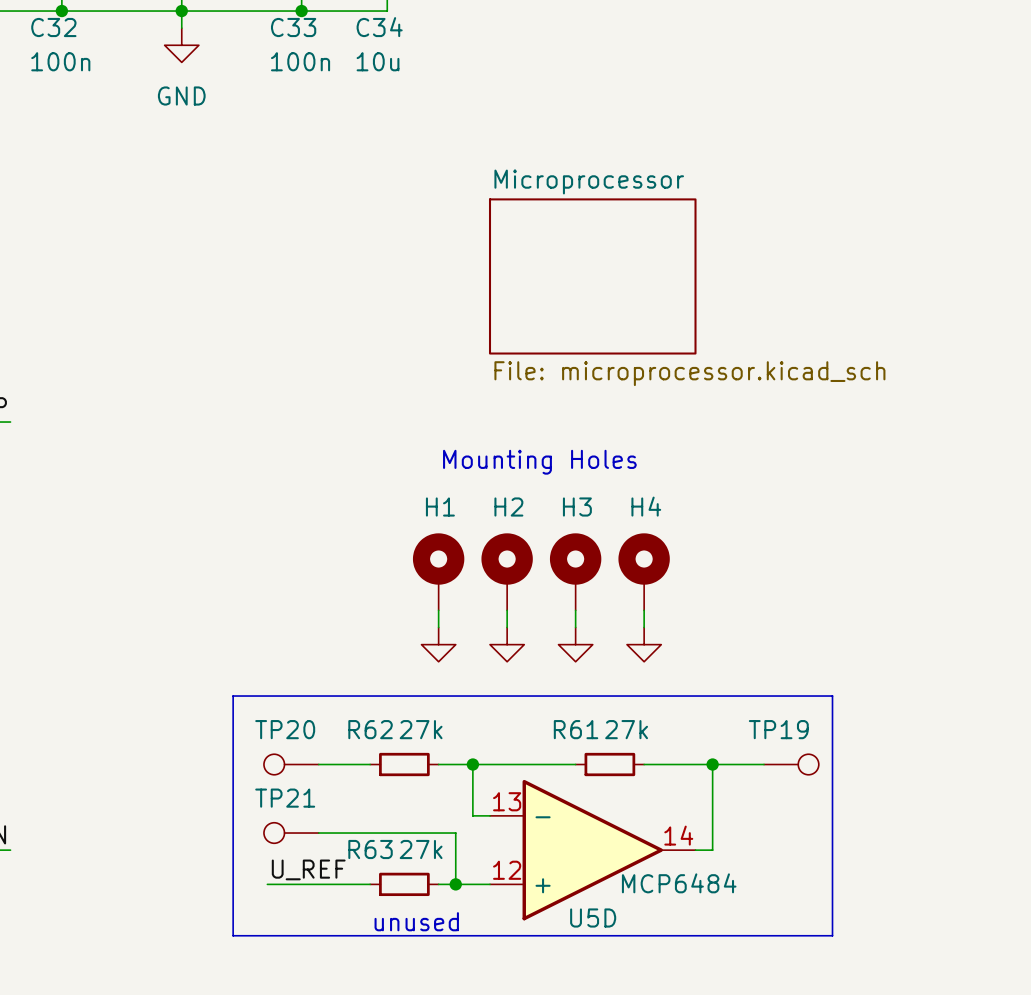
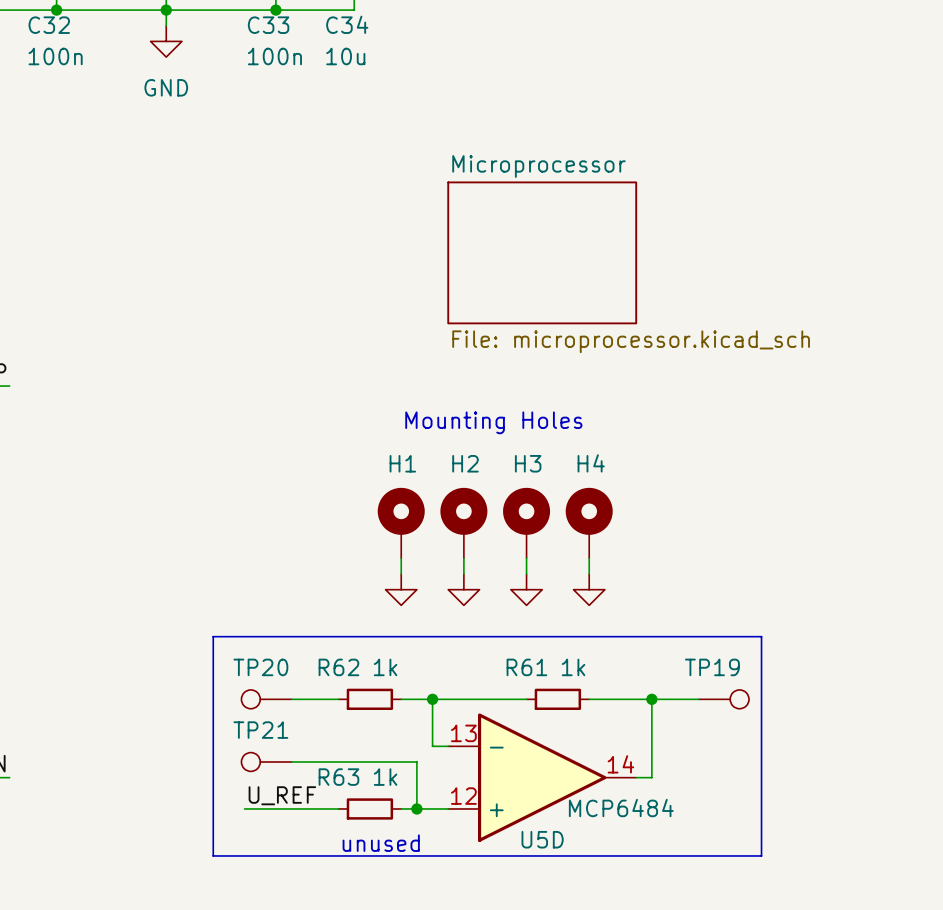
R62 value: 27k (421, 729) -> 1k (385, 667)
R61 value: 27k (626, 729) -> 1k (573, 667)
R63 value: 27k (421, 849) -> 1k (385, 777)

